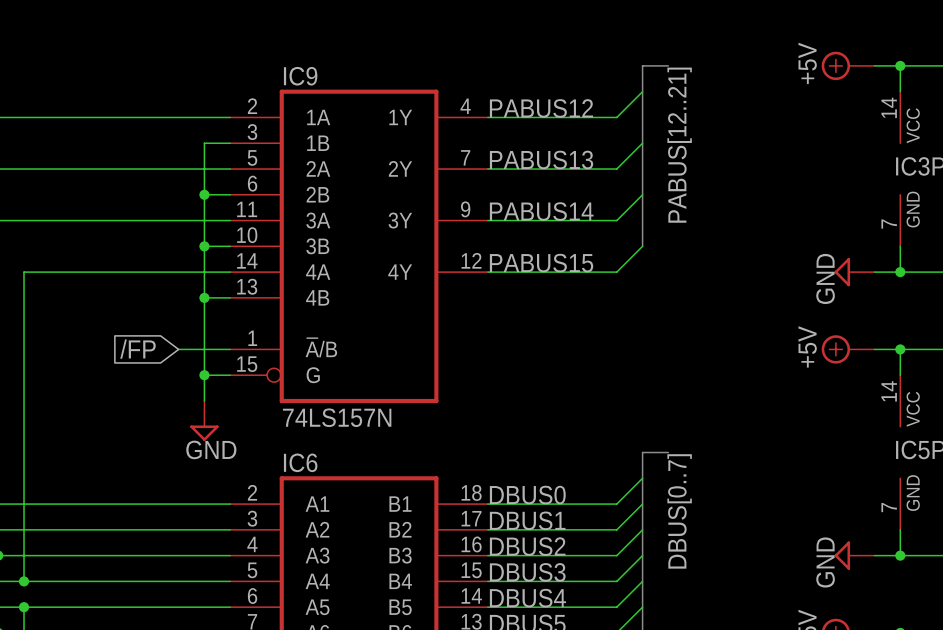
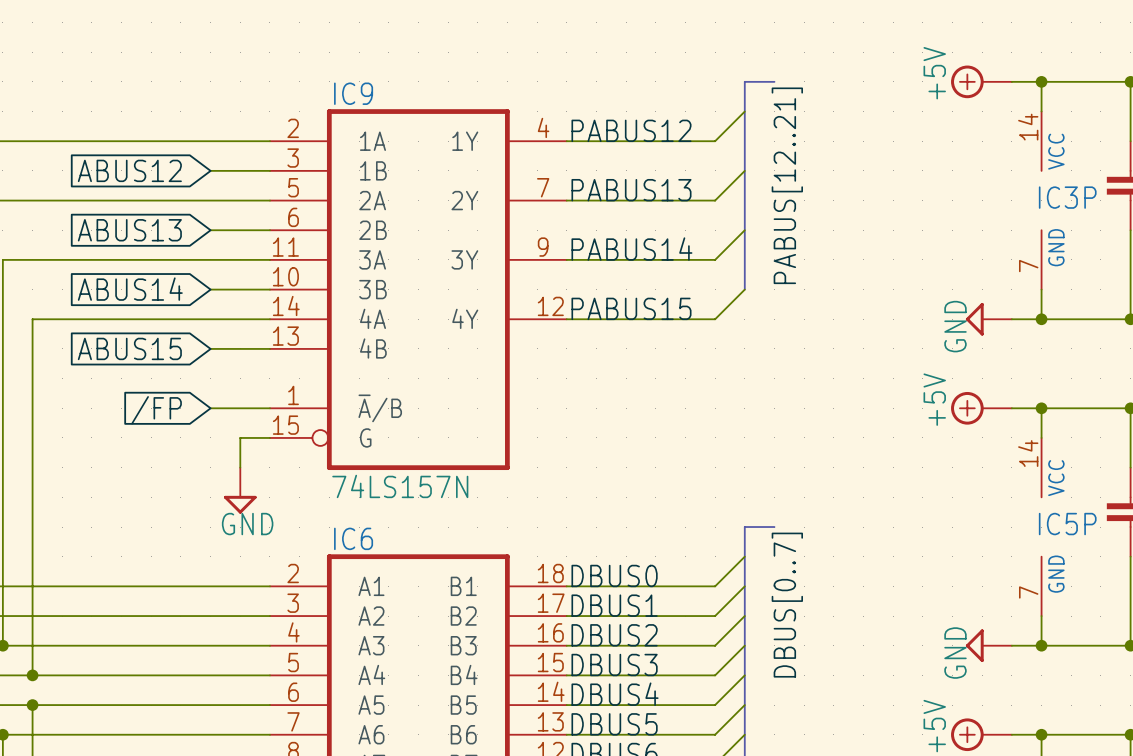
global label: none -> ABUS12 (129, 170)
wire: (204, 143) (204, 375) -> (240, 170) (210, 170)
global label: none -> ABUS13 (129, 230)
wire: none -> (210, 230) (240, 230)
junction: (204, 194) -> none
global label: none -> ABUS14 (130, 289)
wire: none -> (210, 289) (240, 289)
junction: (204, 246) -> none
global label: none -> ABUS15 (129, 348)
wire: none -> (210, 348) (240, 348)
junction: (204, 297) -> none
junction: (204, 375) -> none

